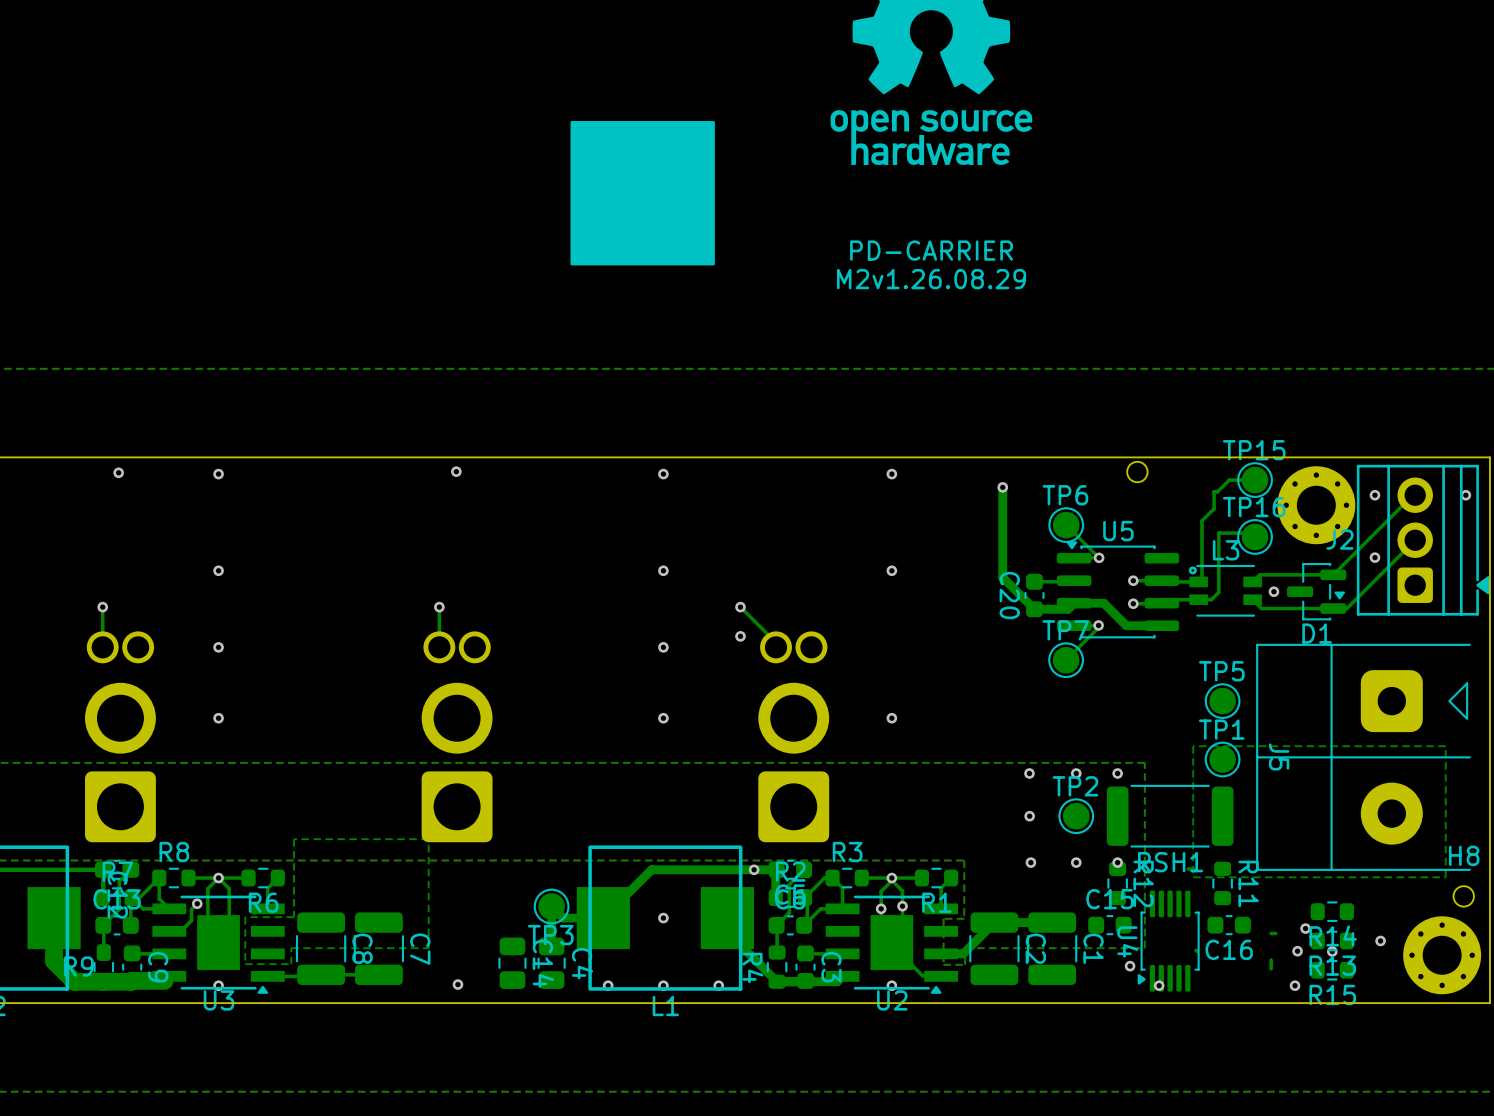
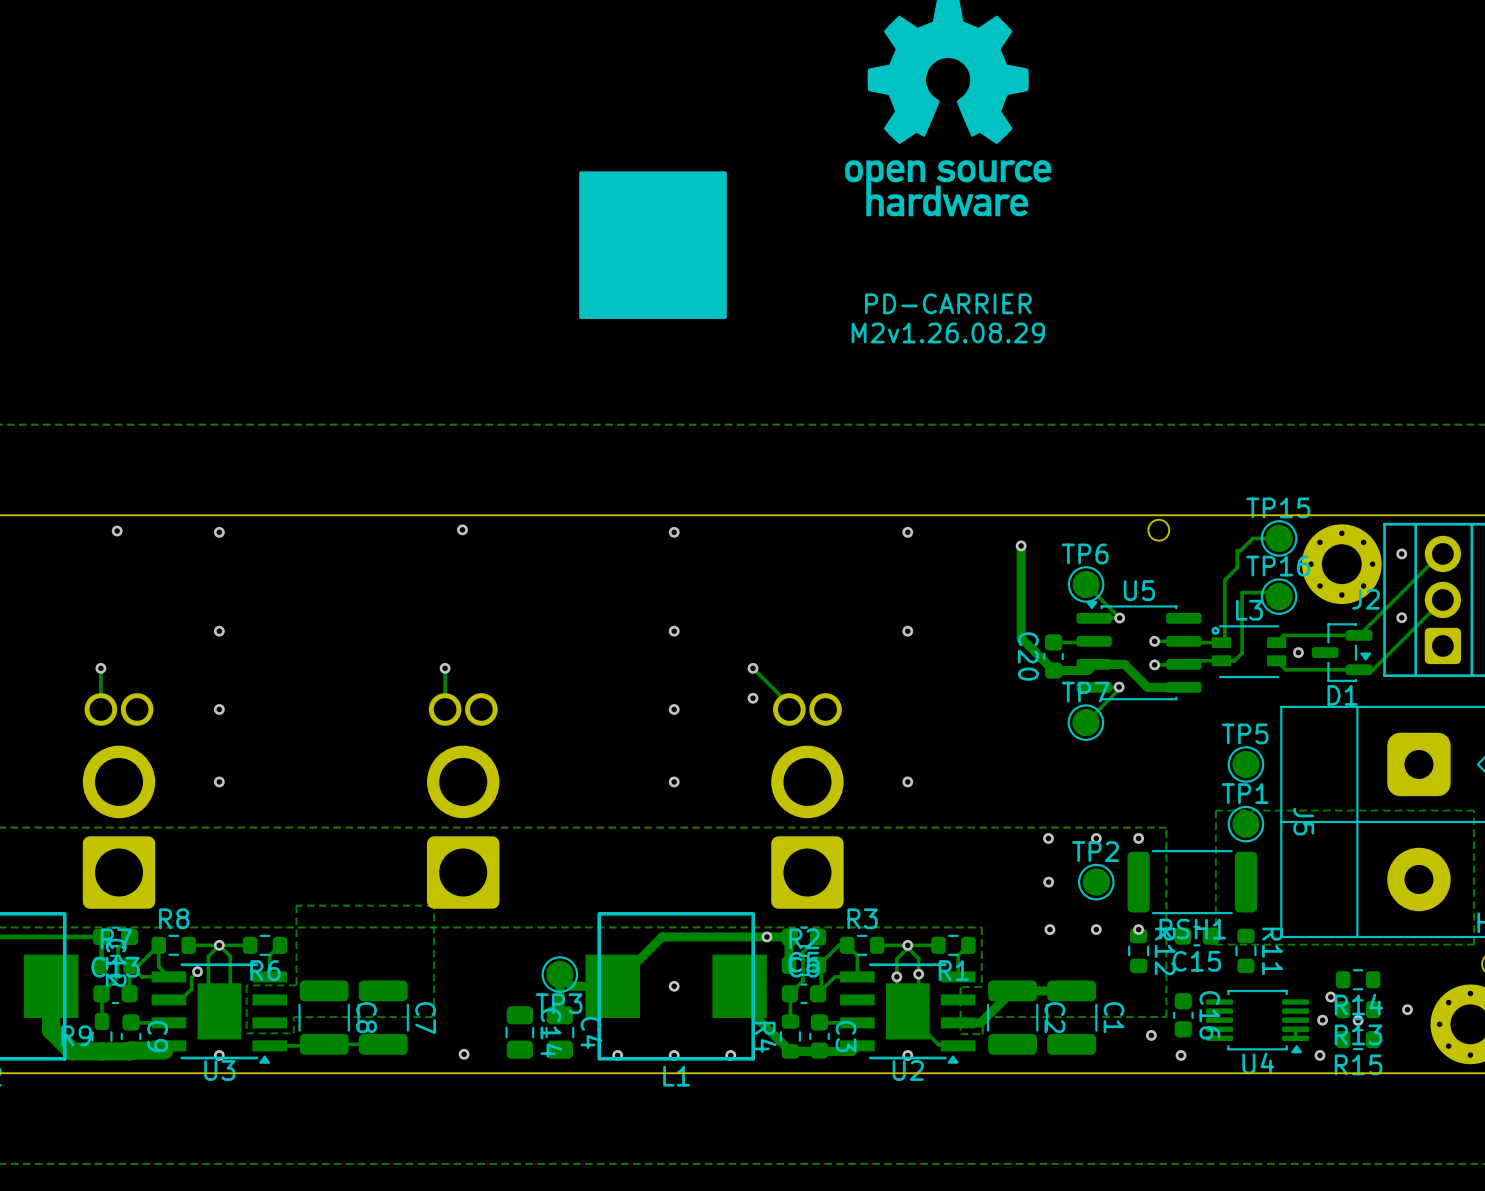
C15 name position: C15 (1109, 899) -> C15 (1196, 961)
C15 position: (1109, 925) -> (1196, 936)
C16 rotation: 0° (1229, 925) -> 90° clockwise (1183, 1015)
C16 position: (1229, 925) -> (1183, 1015)
U4 rotation: 0° (1168, 941) -> 90° counterclockwise (1257, 1021)
U4 position: (1168, 941) -> (1257, 1021)
C16 name position: C16 (1229, 949) -> C16 (1209, 1015)

